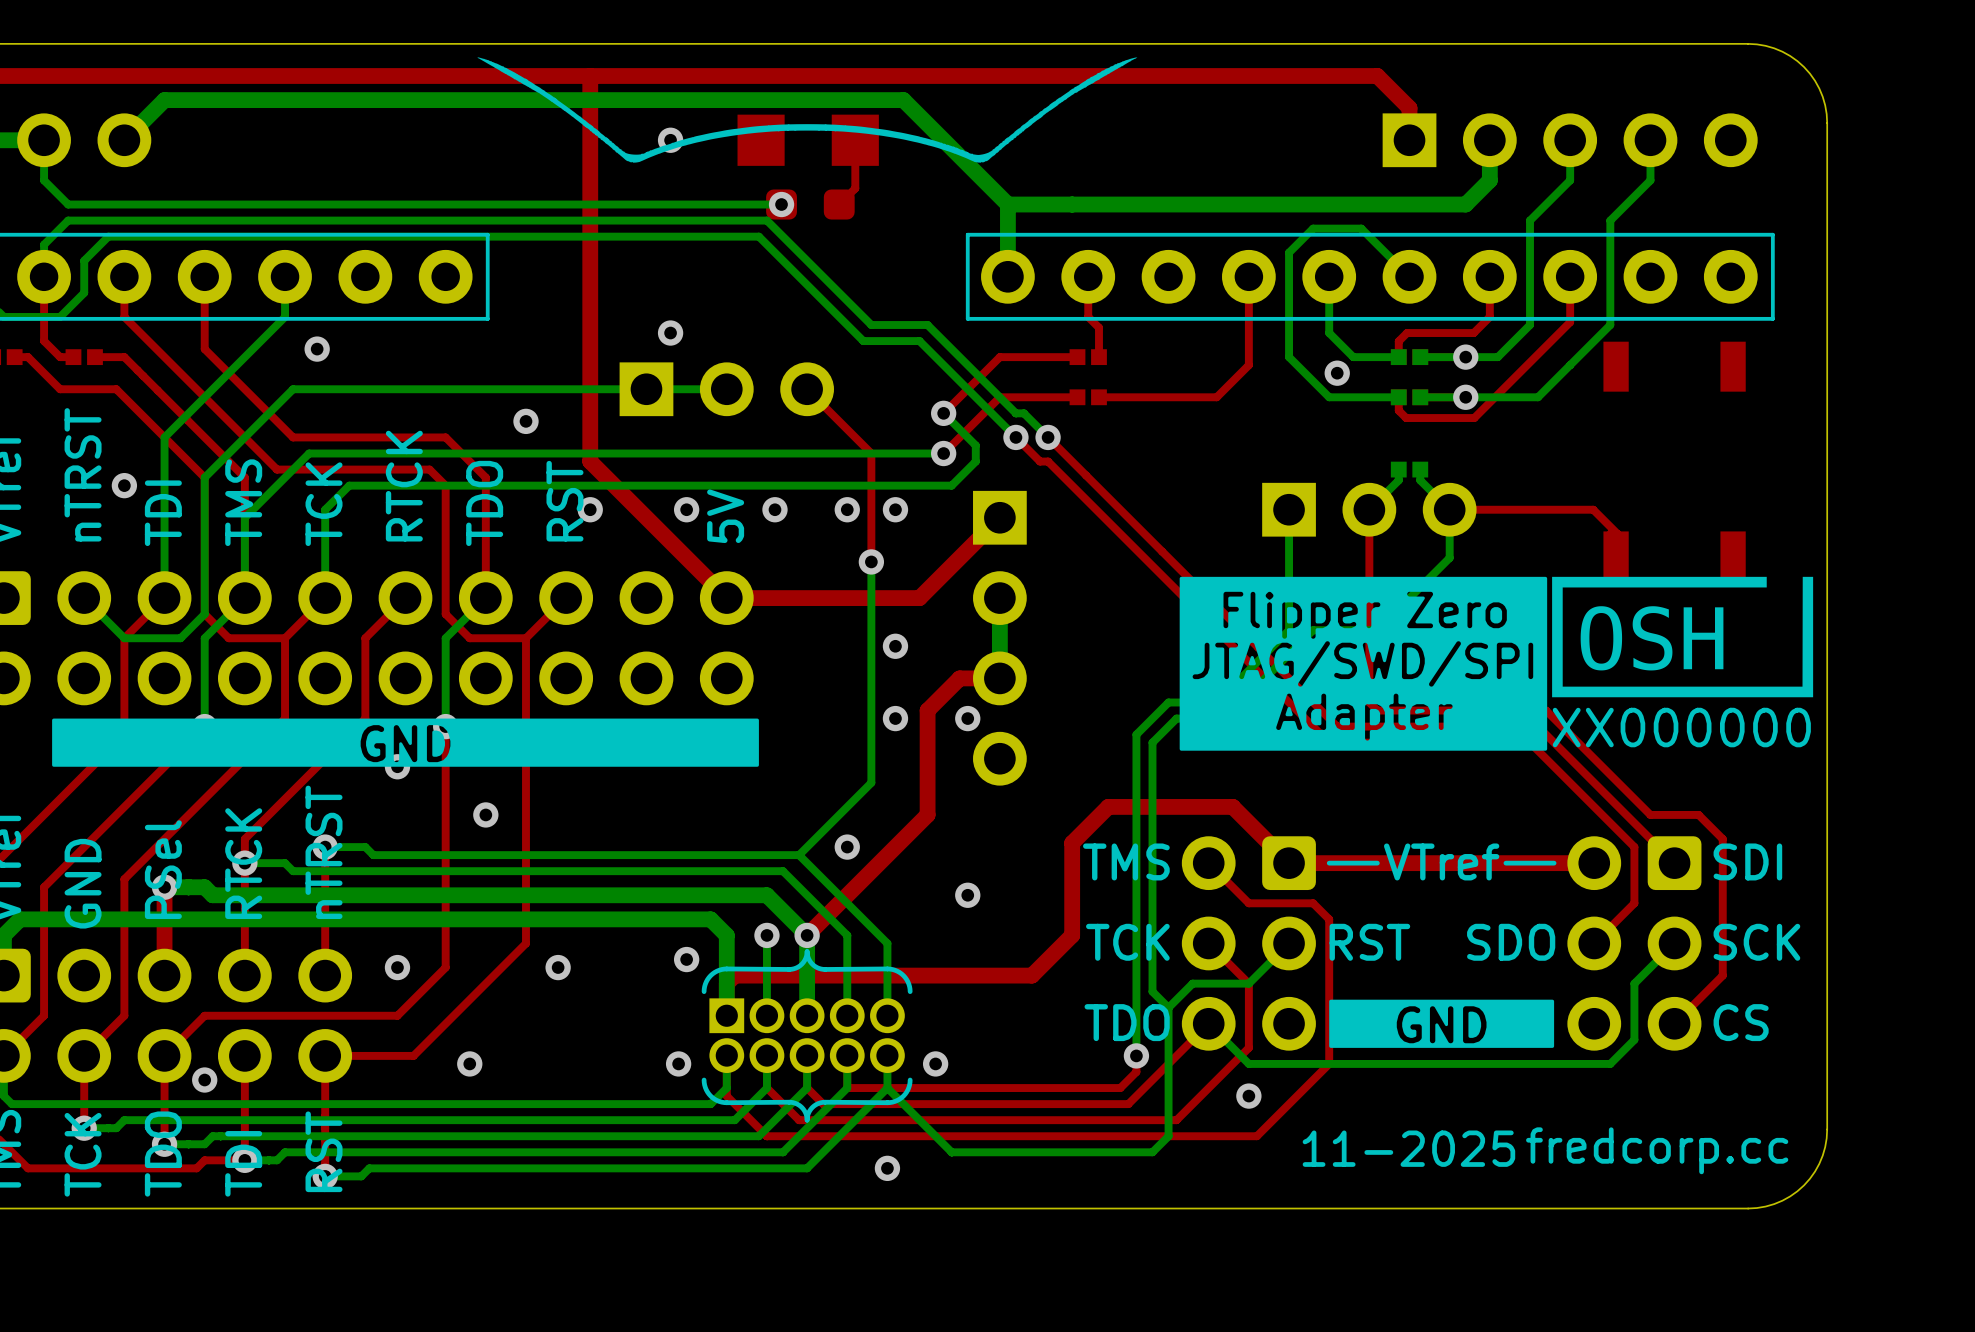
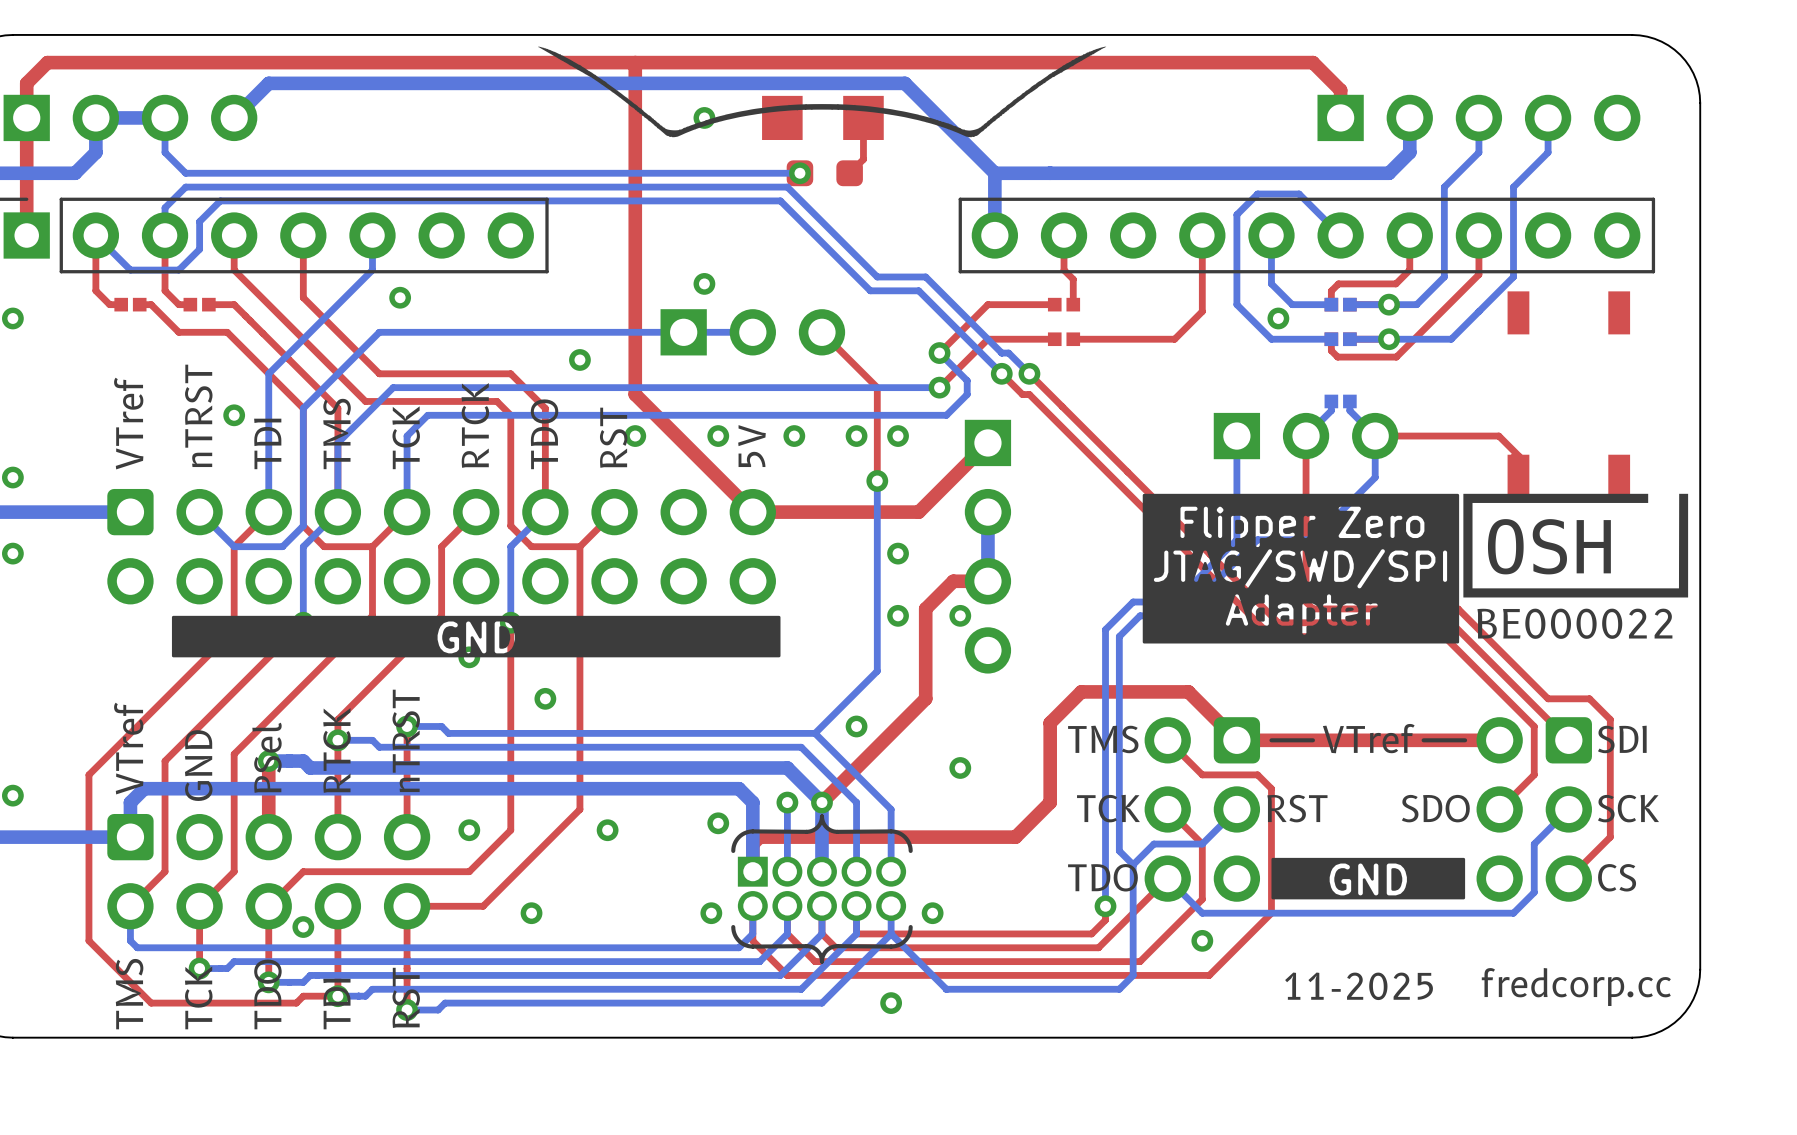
drawing shape: [1552, 576, 1814, 748] -> [1463, 493, 1689, 639]

